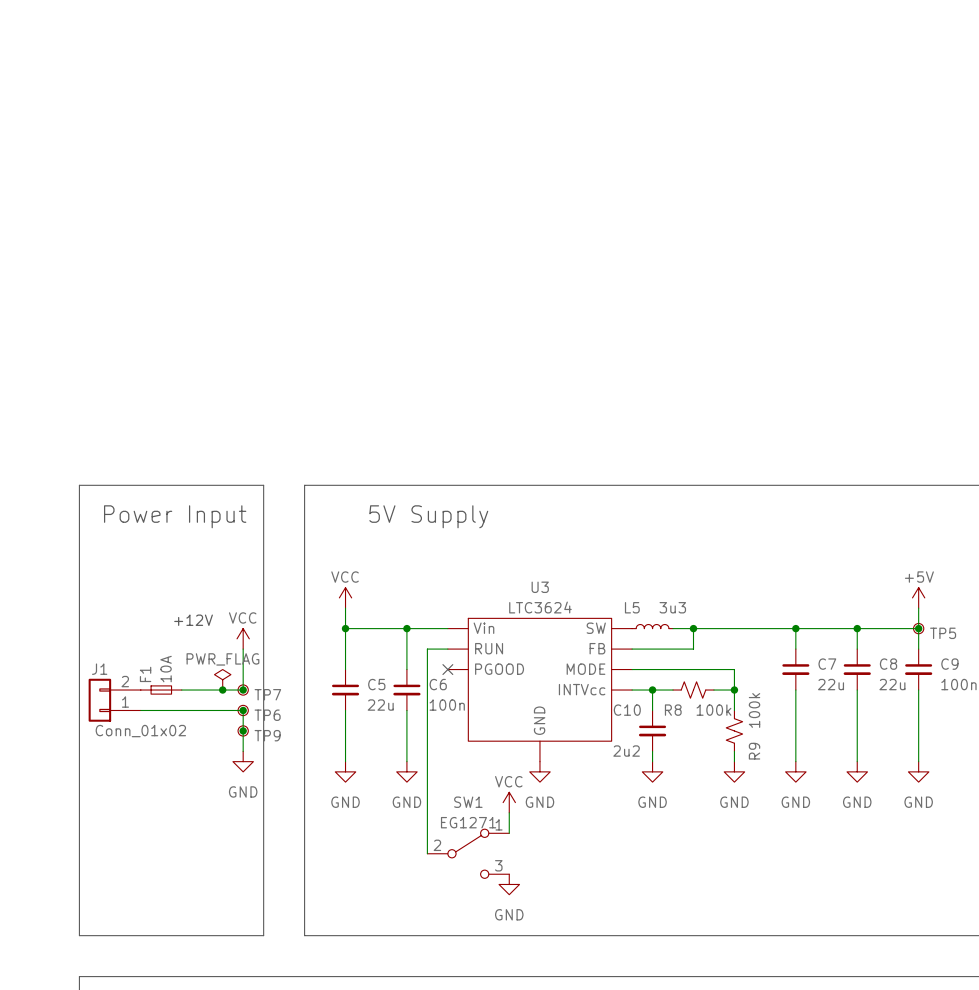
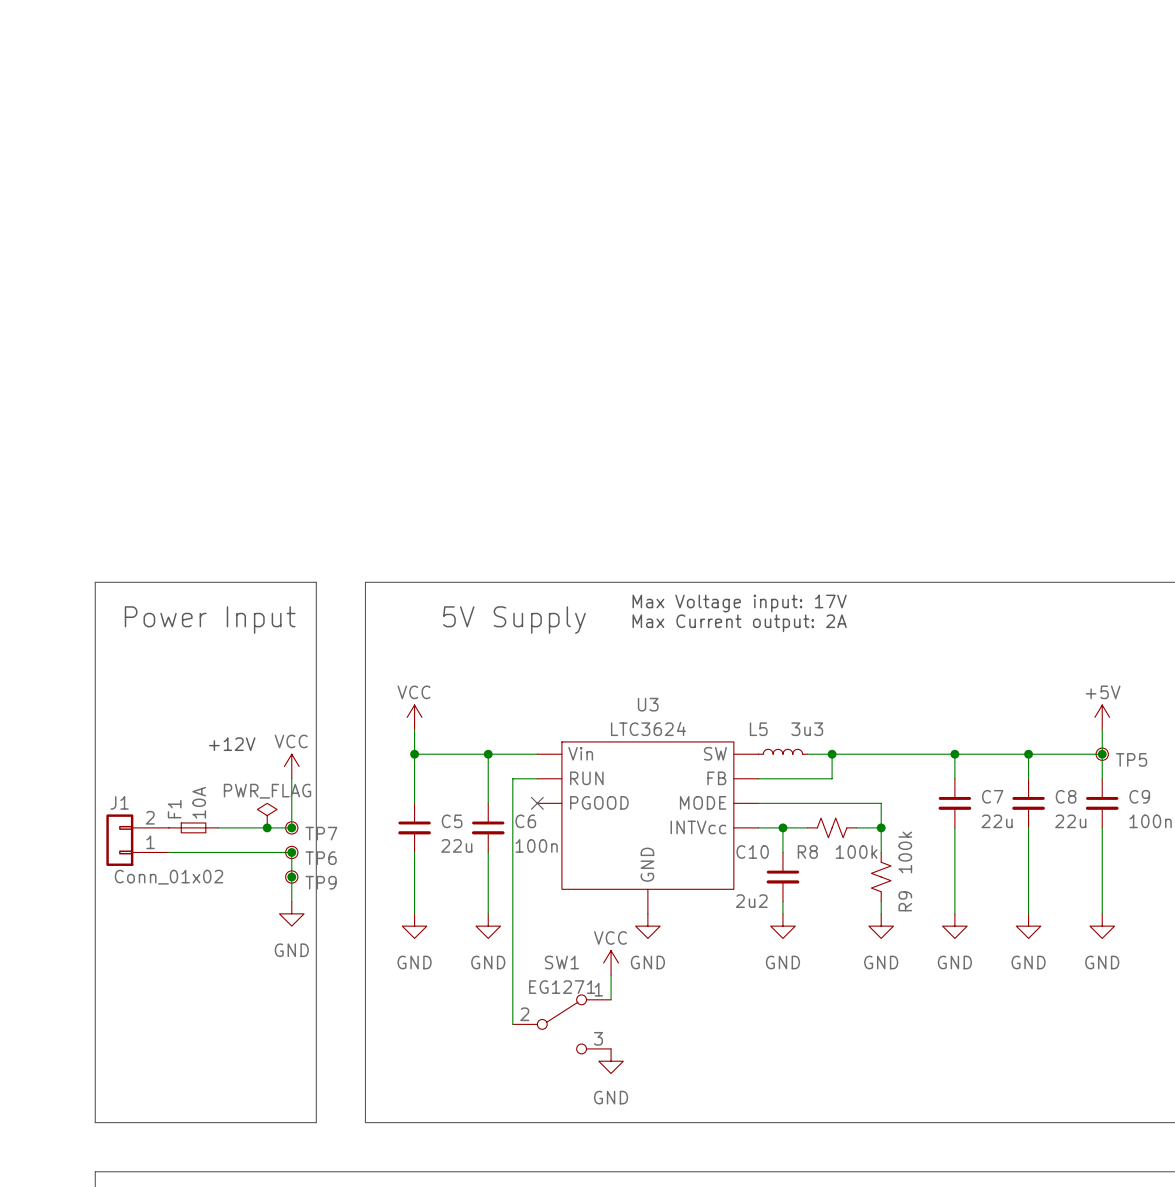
text: none -> Max Voltage input: 17V (739, 603)
text: none -> Max Current output: 2A (739, 623)

